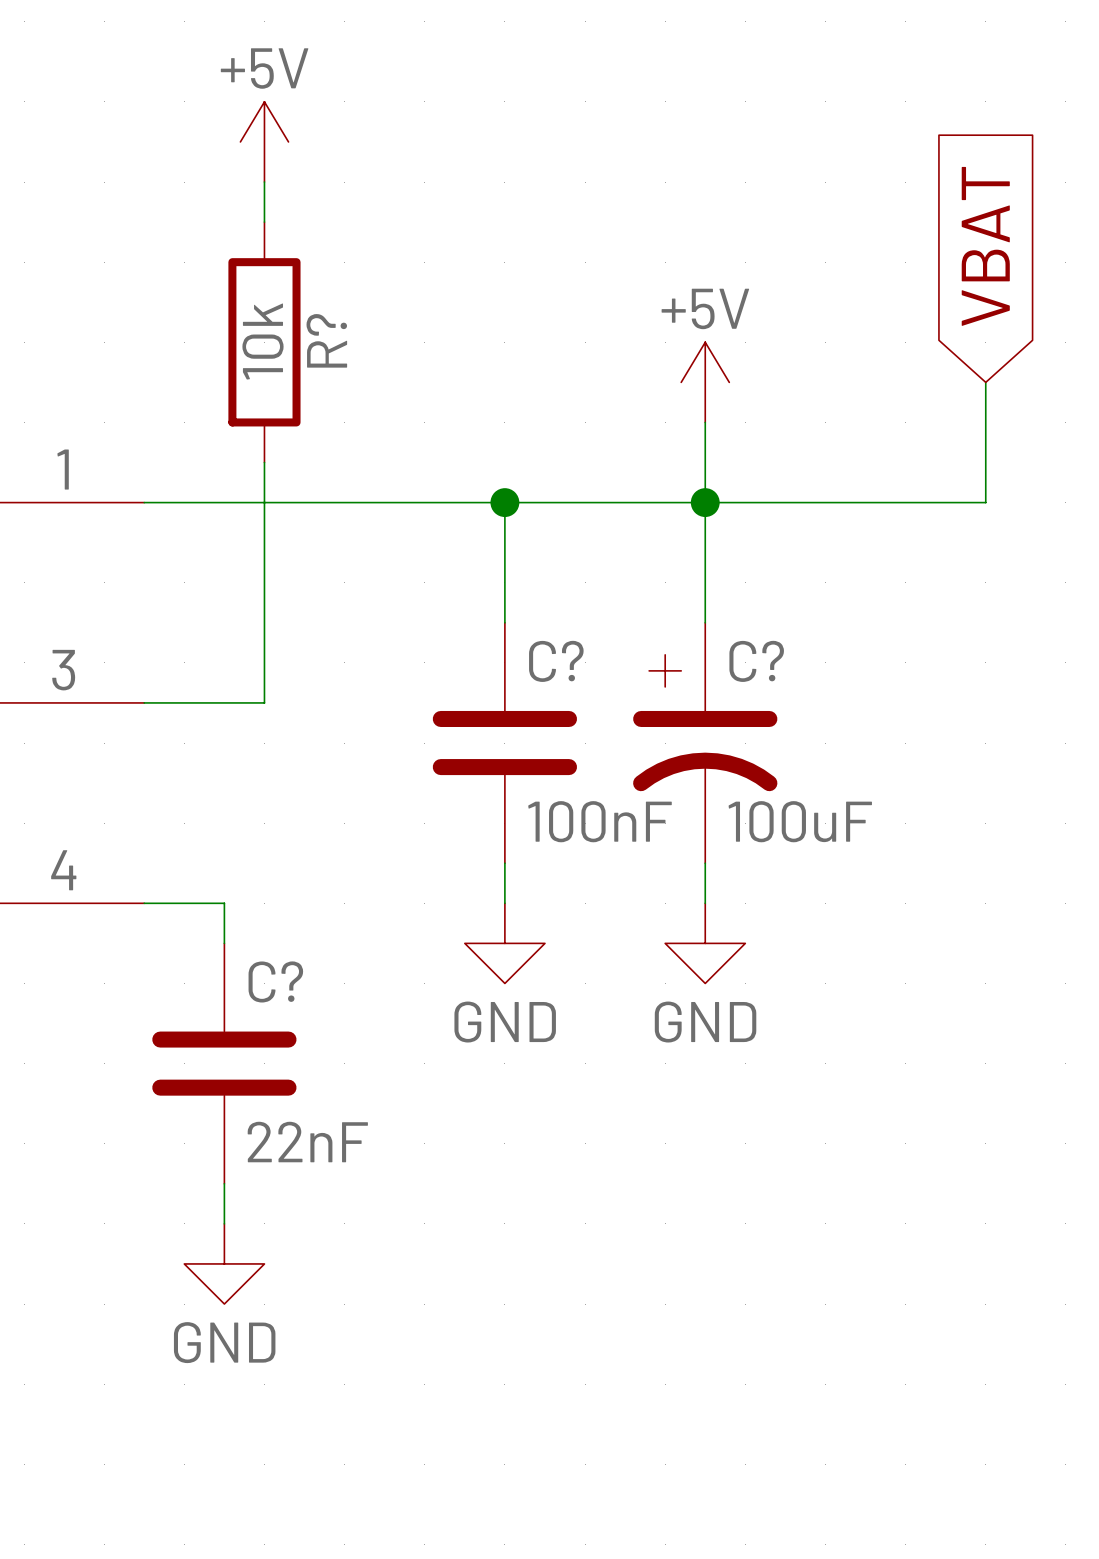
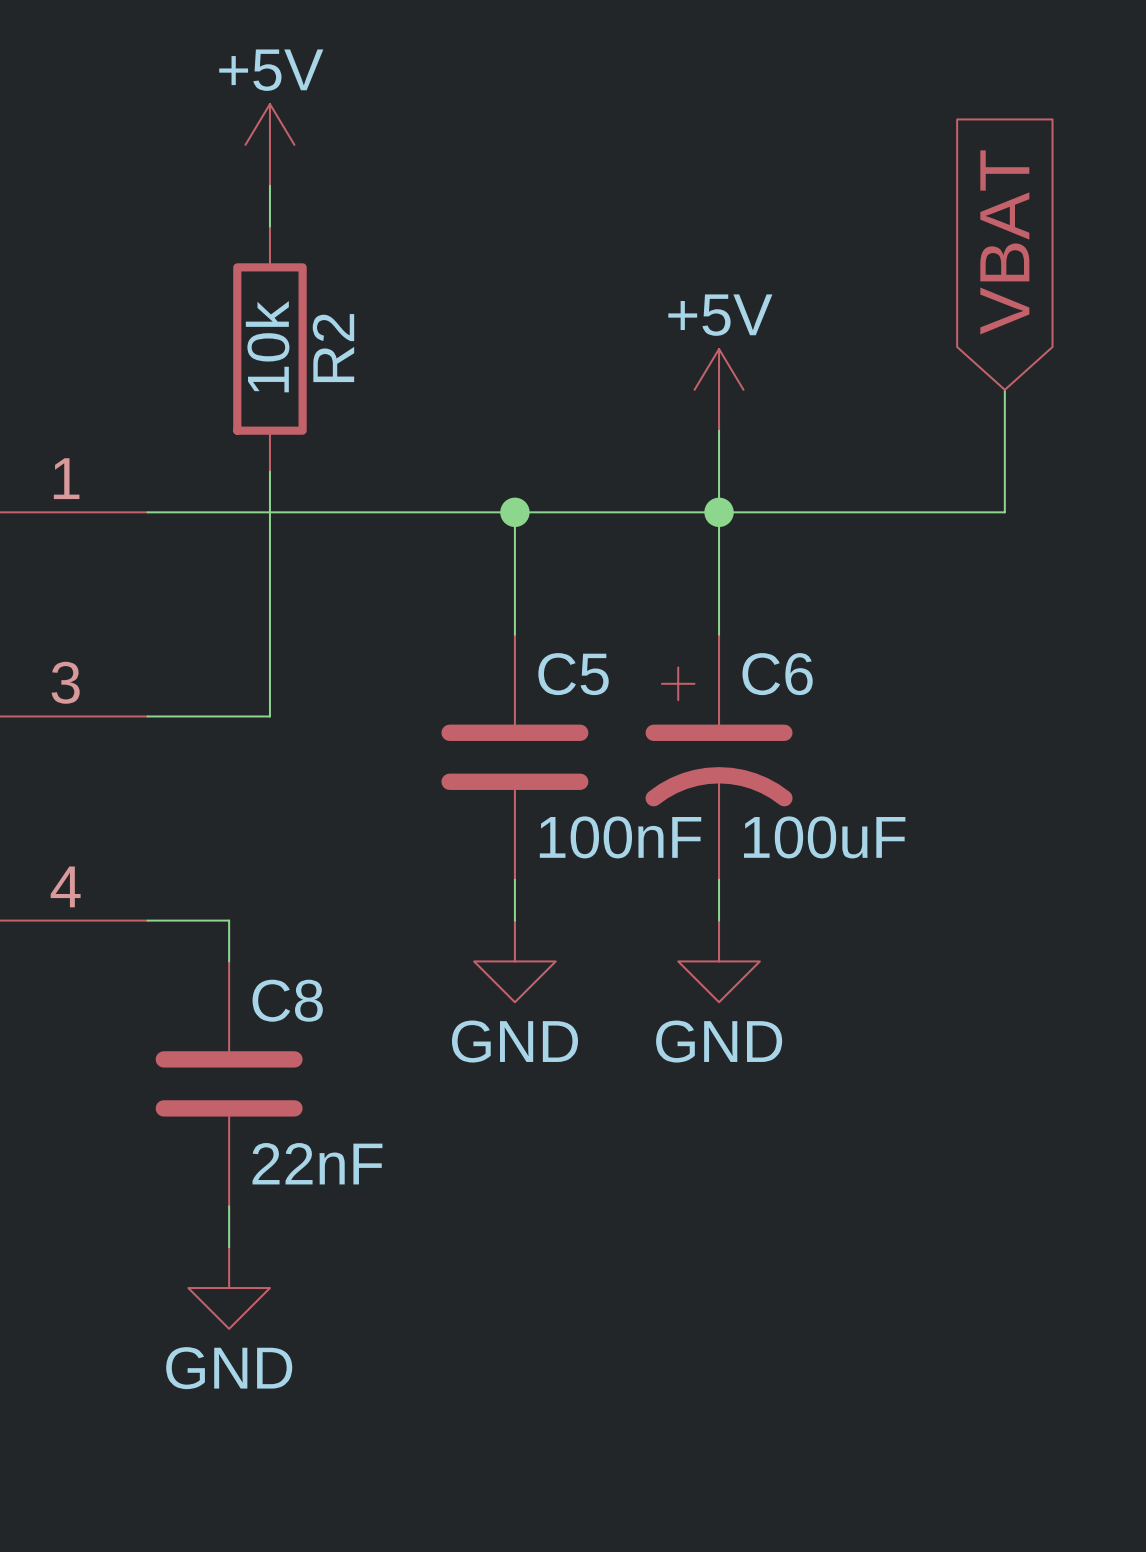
R? name: R? (326, 340) -> R2 (333, 348)
C? name: C? (556, 661) -> C5 (573, 674)
C? name: C? (756, 661) -> C6 (777, 674)
C? name: C? (275, 981) -> C8 (287, 1000)

